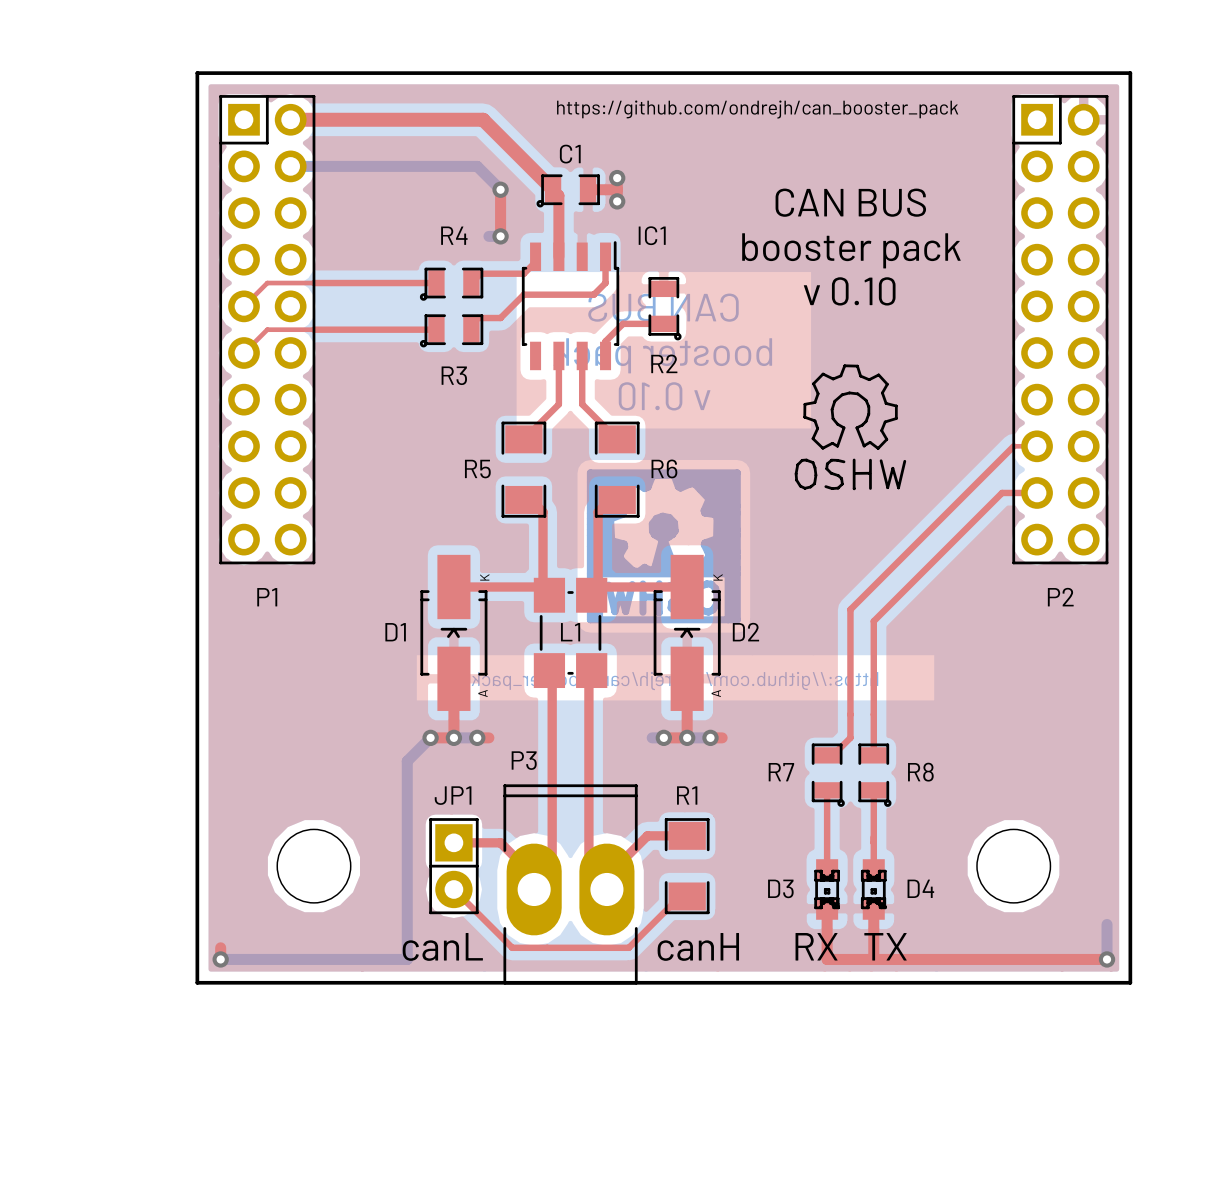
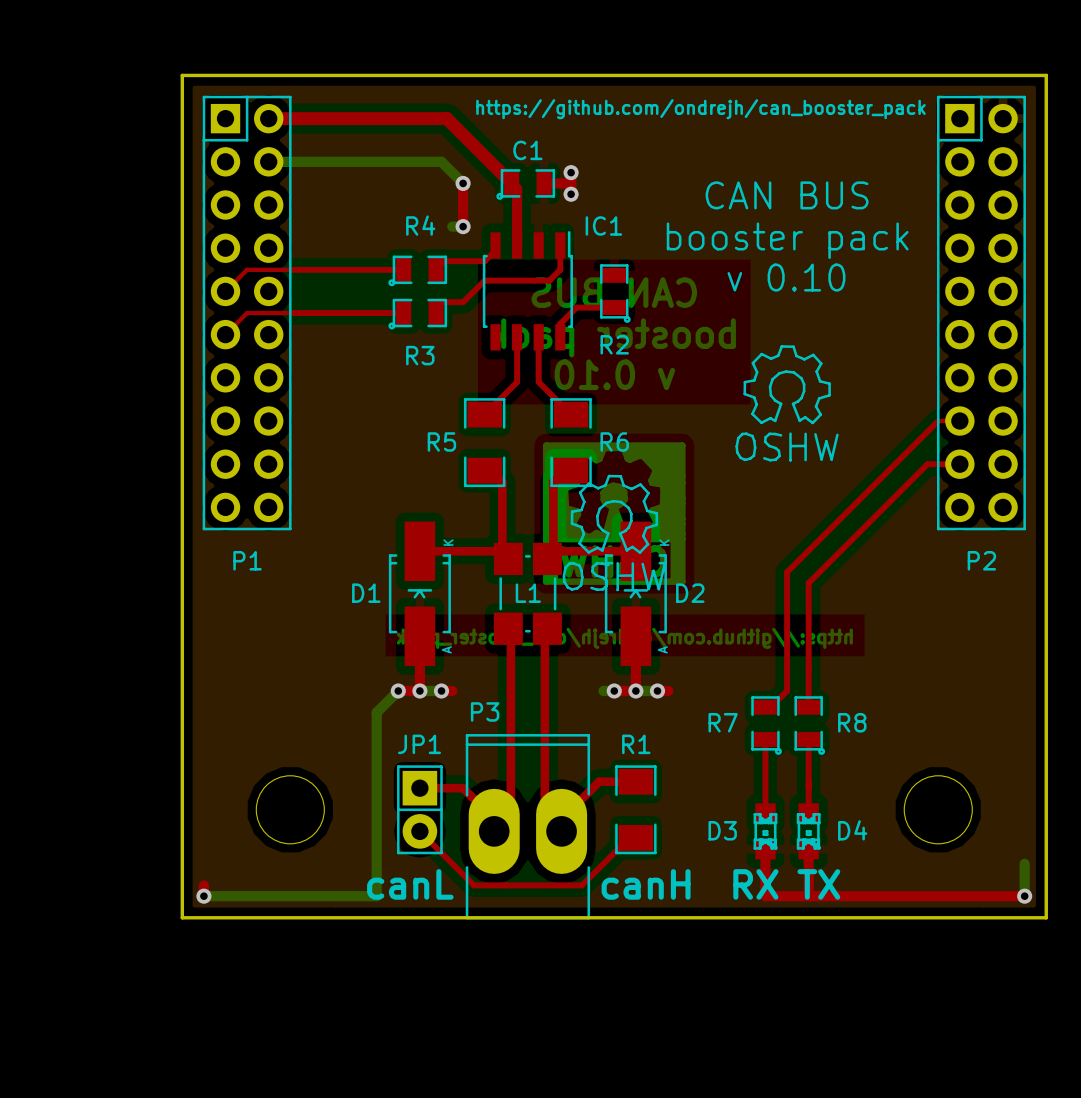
drawing: none -> [562, 474, 666, 592]

